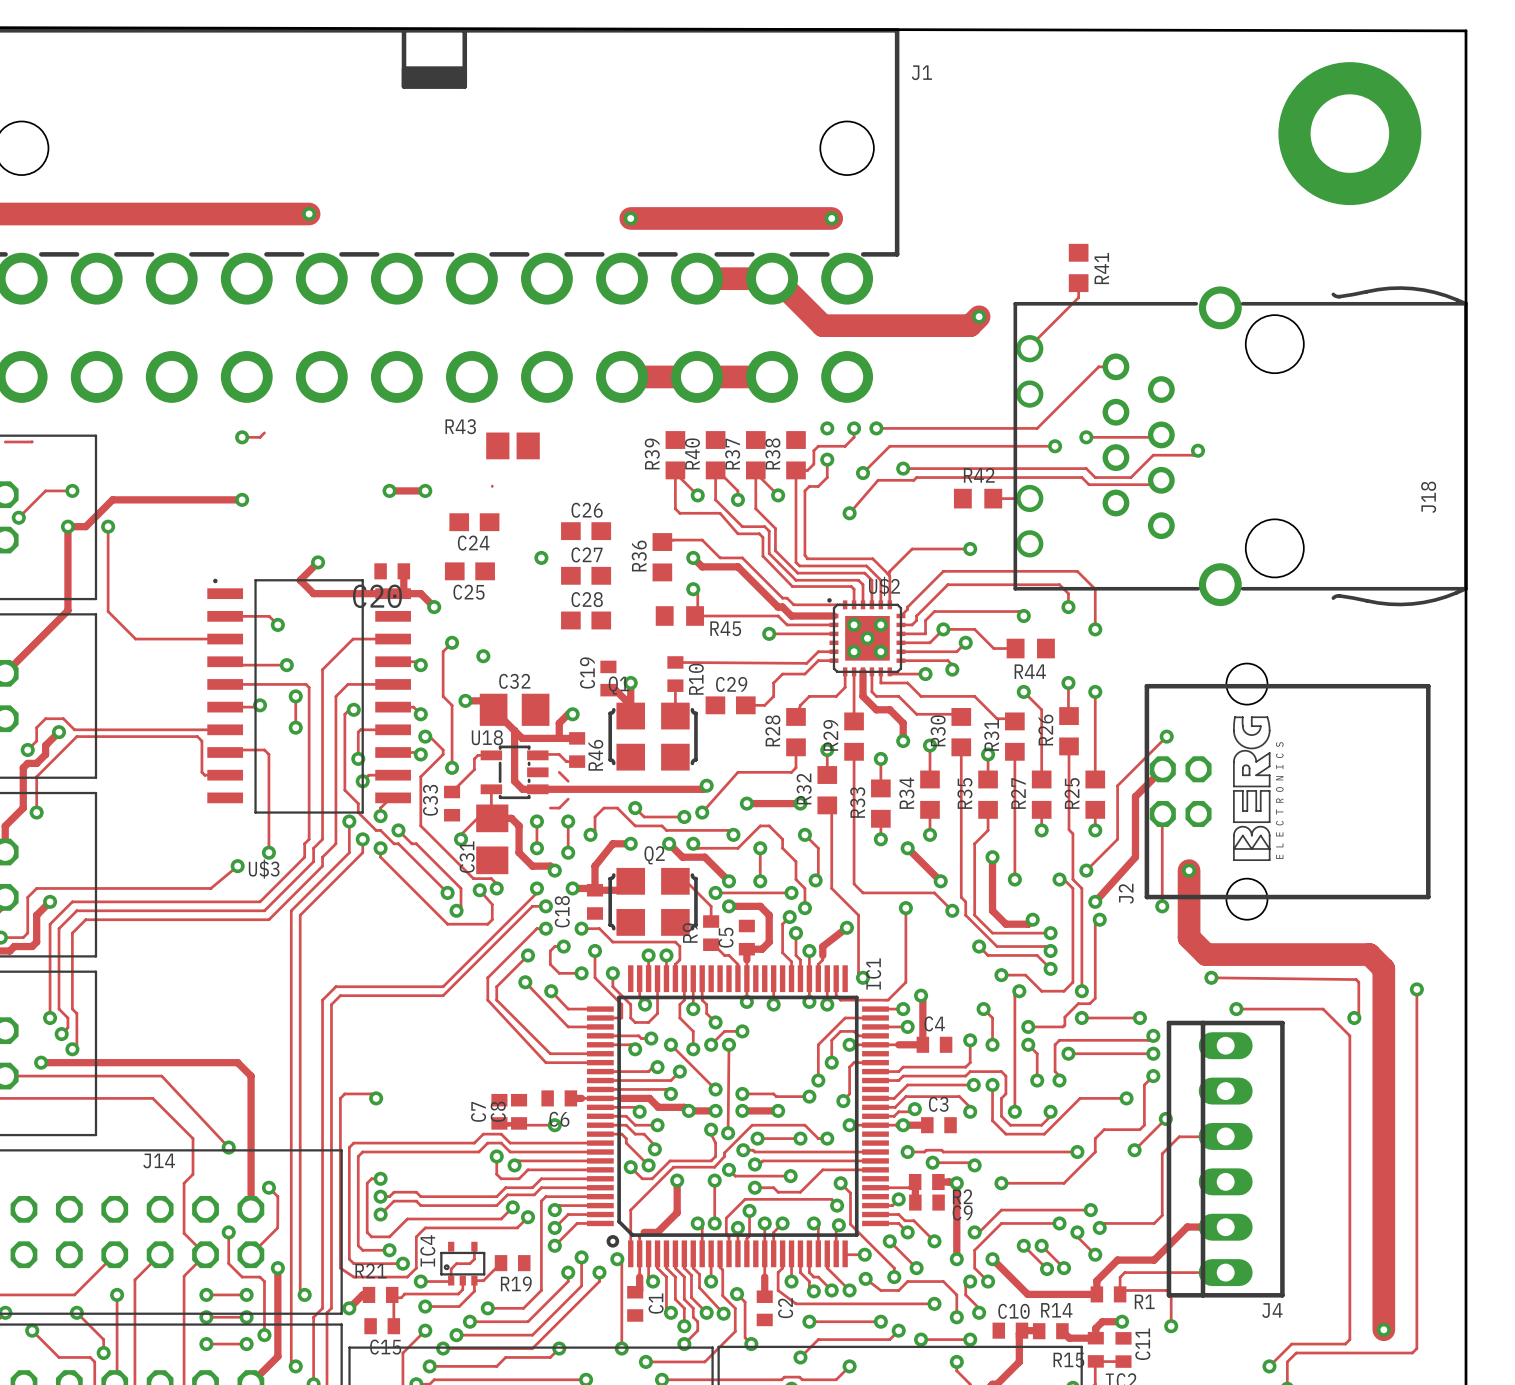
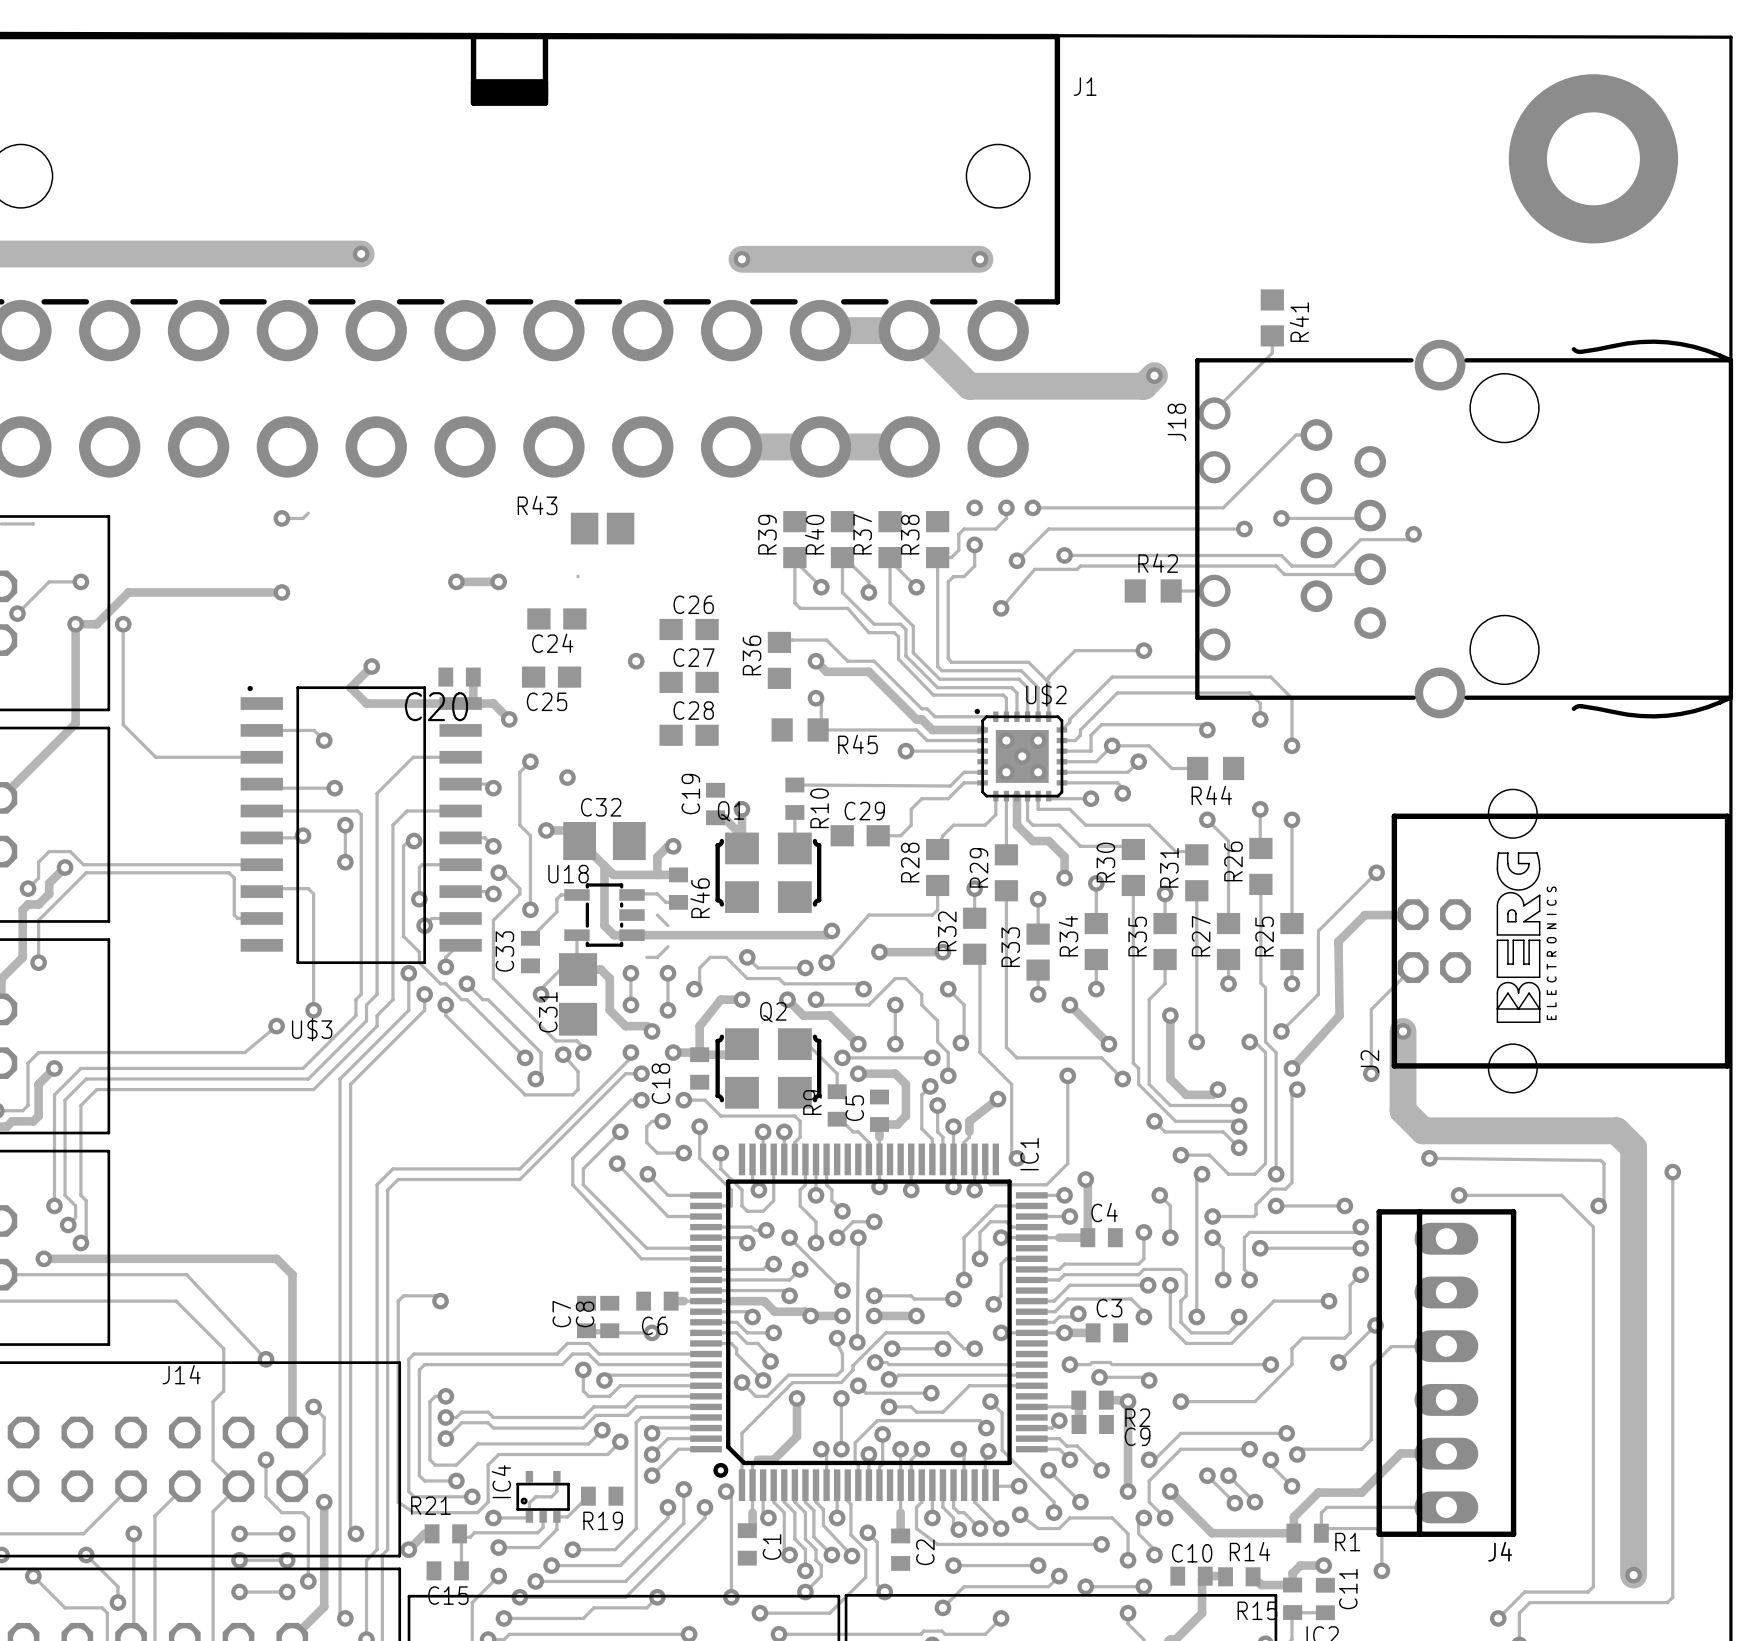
J18 name position: J18 (1428, 497) -> J18 (1176, 422)
track: (1162, 768) (1135, 796) (1135, 857) -> (1413, 916) (1364, 915) (1338, 941) (1339, 1015)
J2 position: (1287, 791) -> (1560, 941)
track: (1162, 813) (1162, 852) -> (1413, 967) (1371, 1009)

